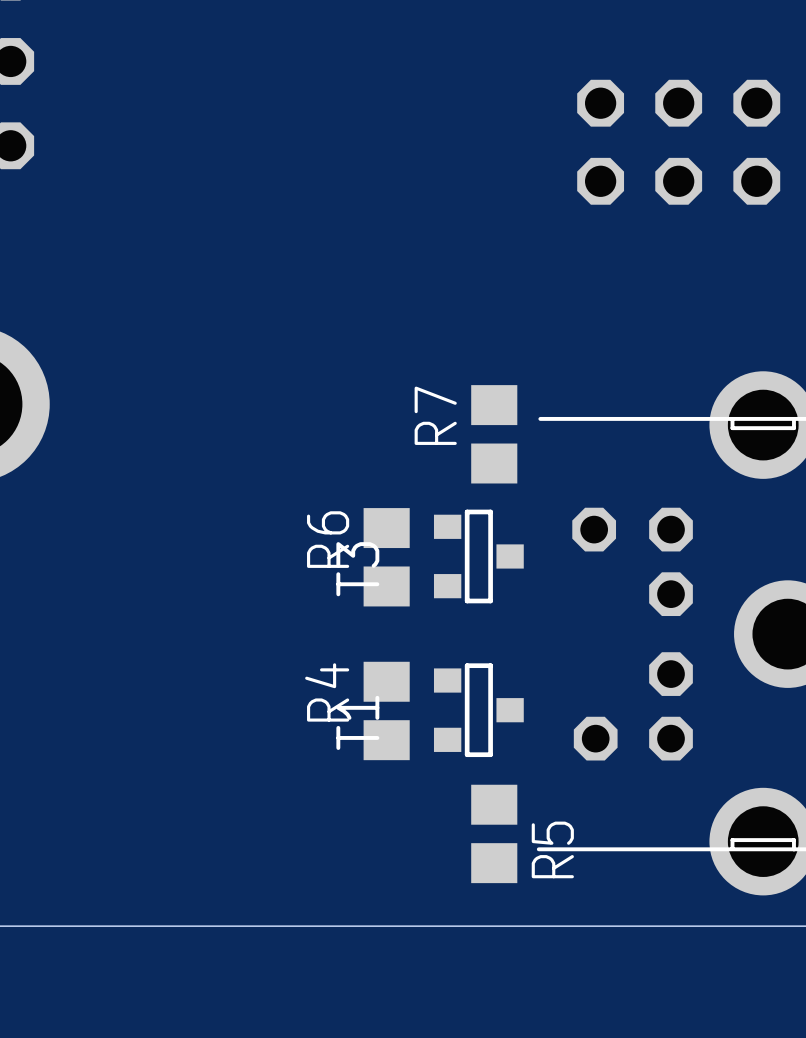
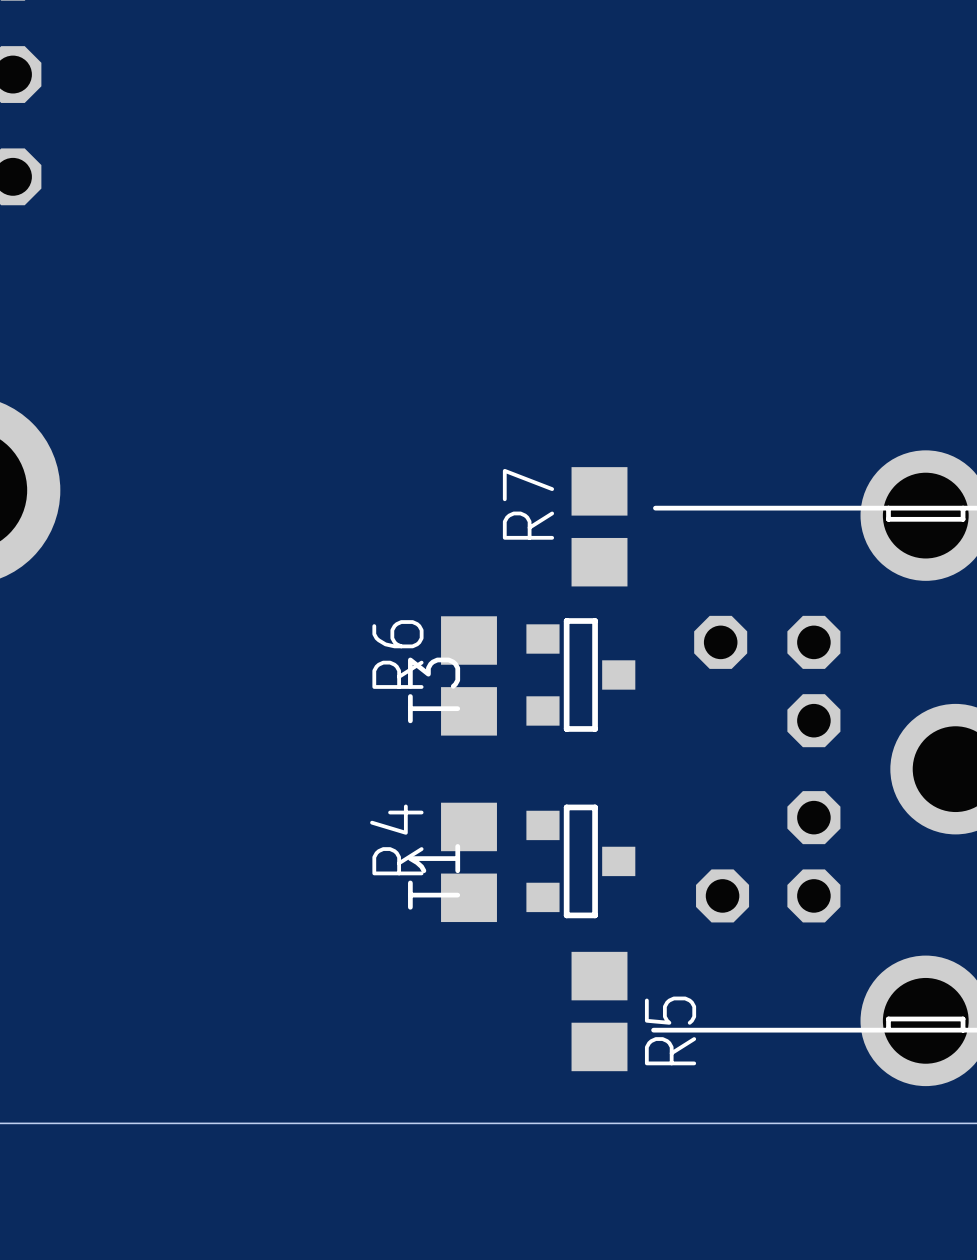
part: (678, 142) -> none

